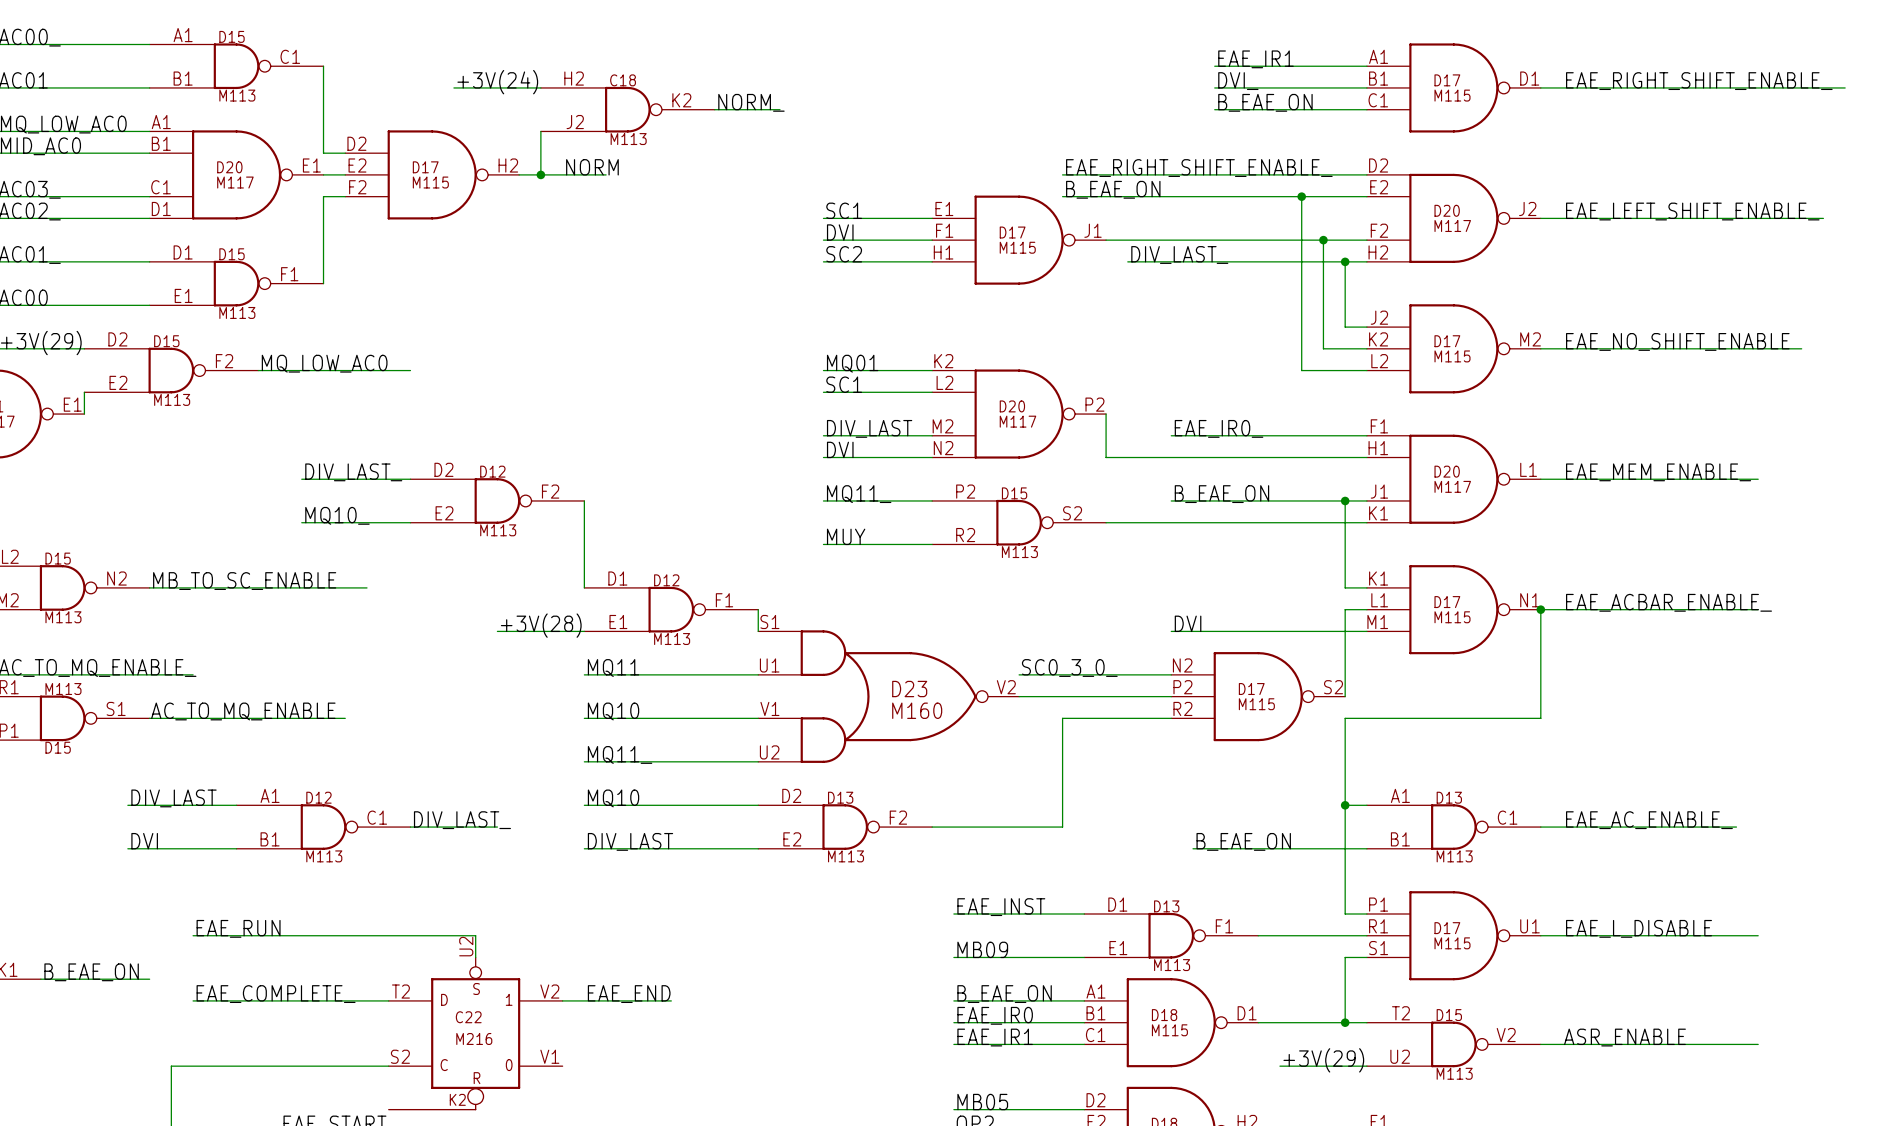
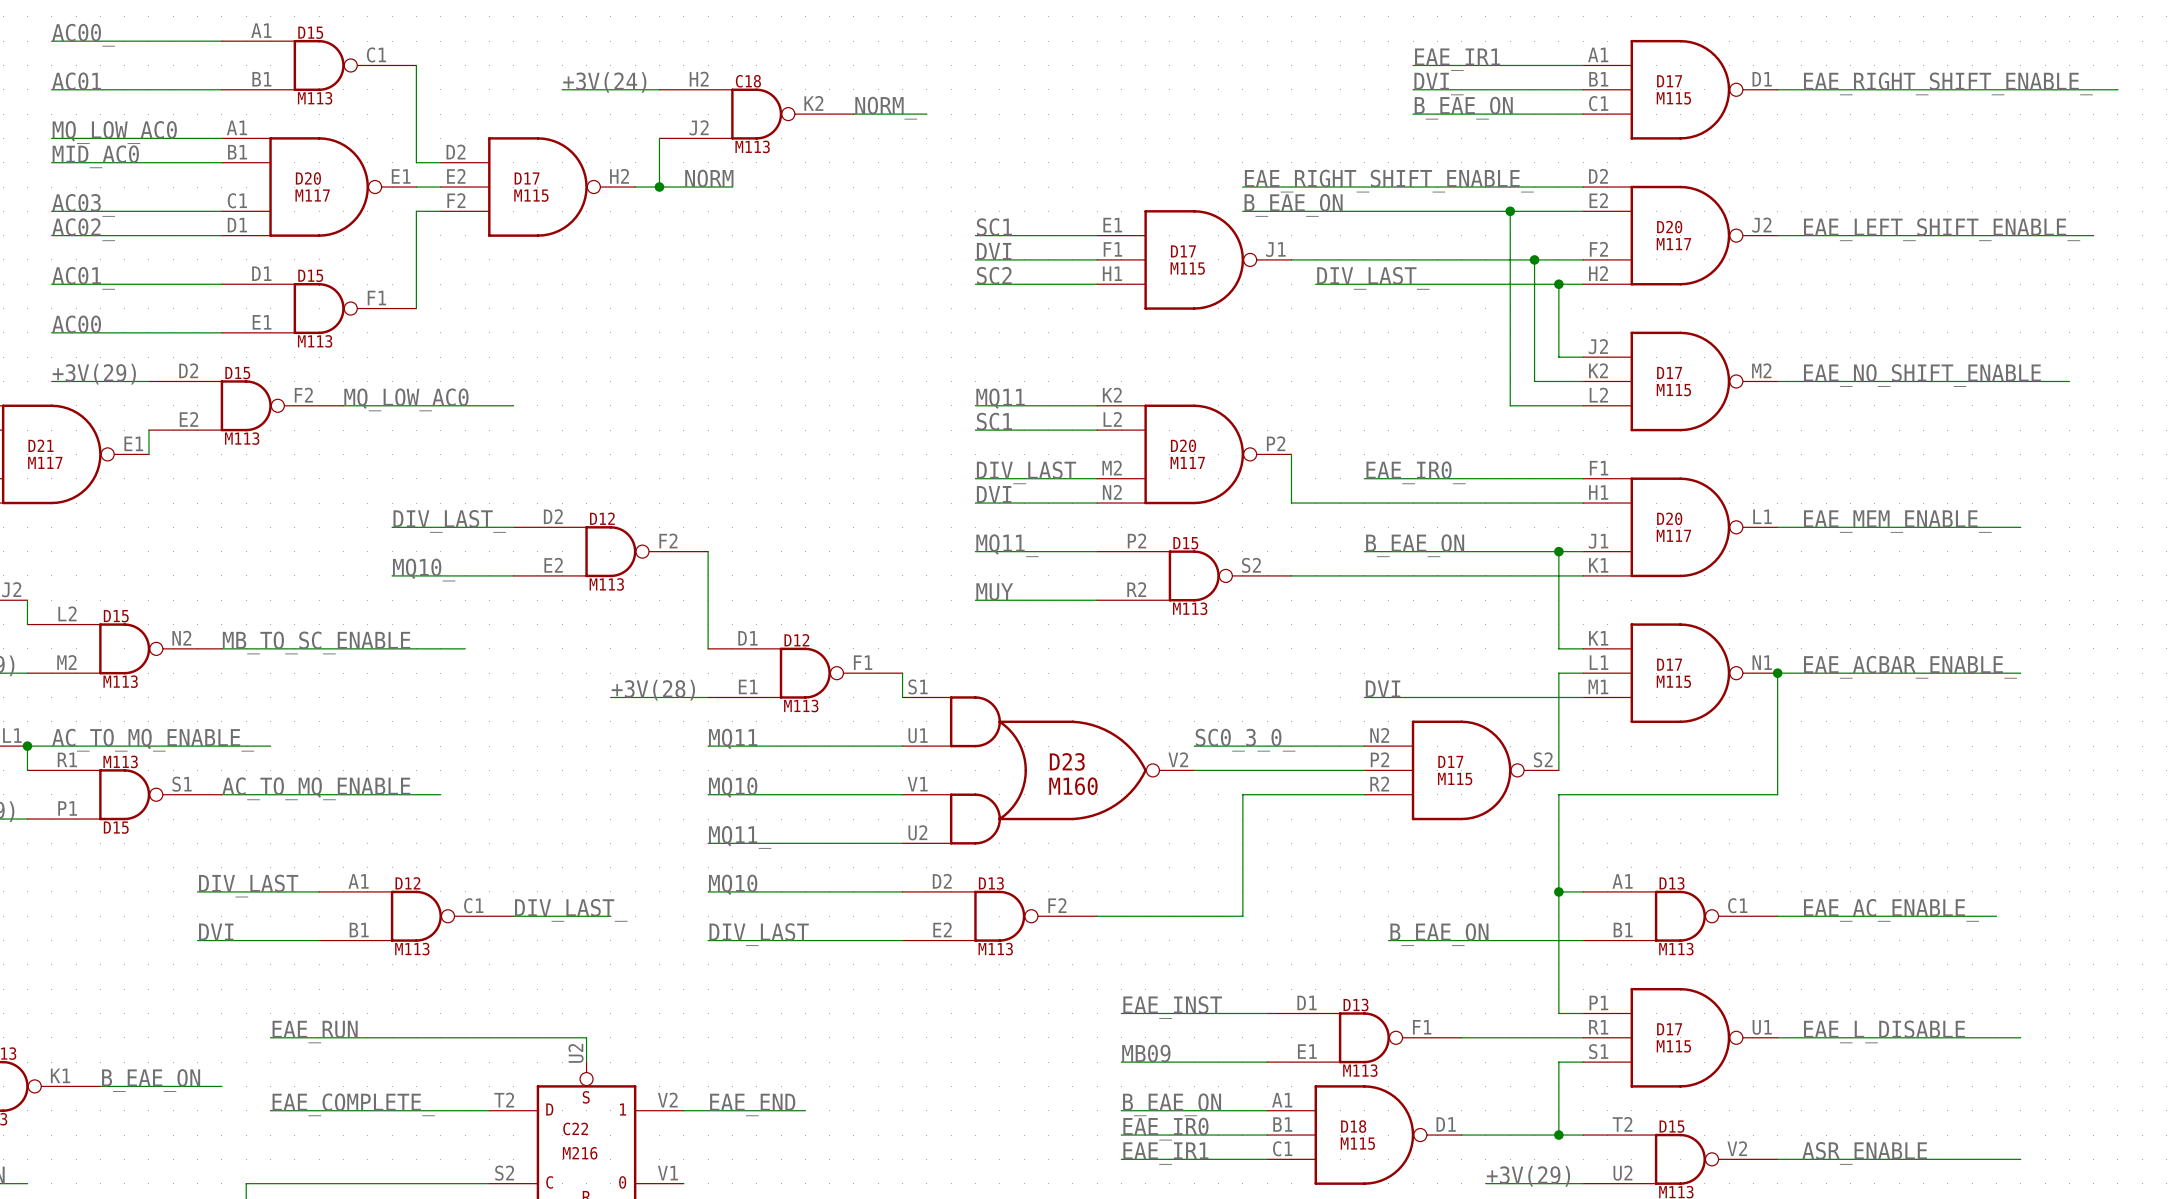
label: MQ01 (852, 363) -> MQ11 (1000, 398)

